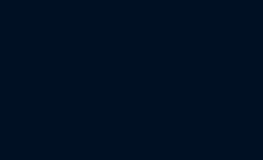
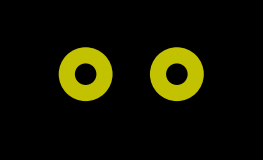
part: none -> (131, 74)

